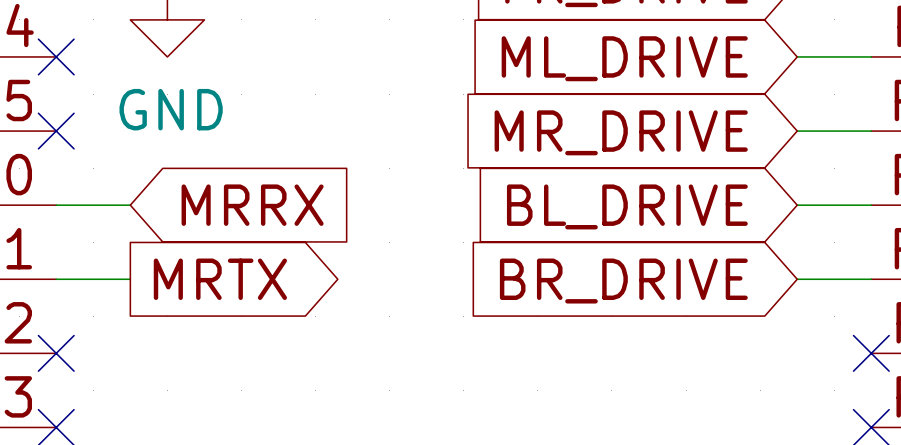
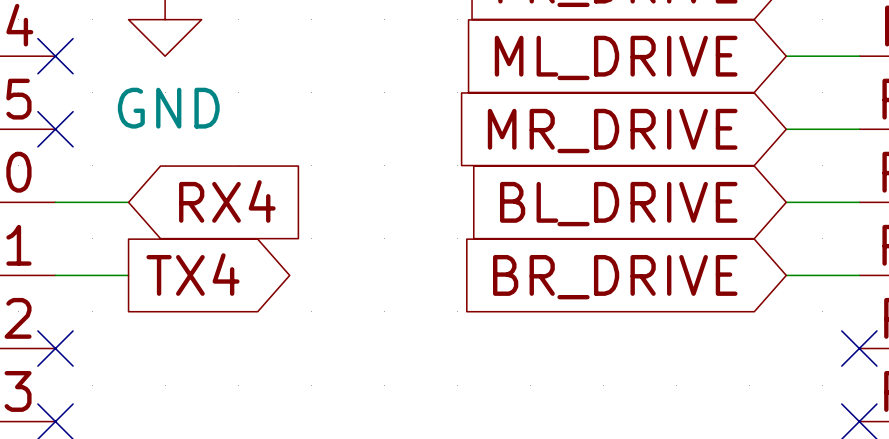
global label: MRRX (252, 205) -> RX4 (227, 201)
global label: MRTX (220, 279) -> TX4 (192, 274)

